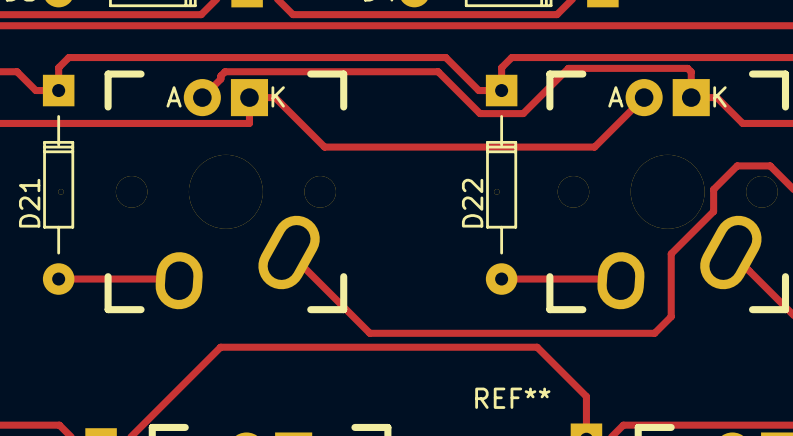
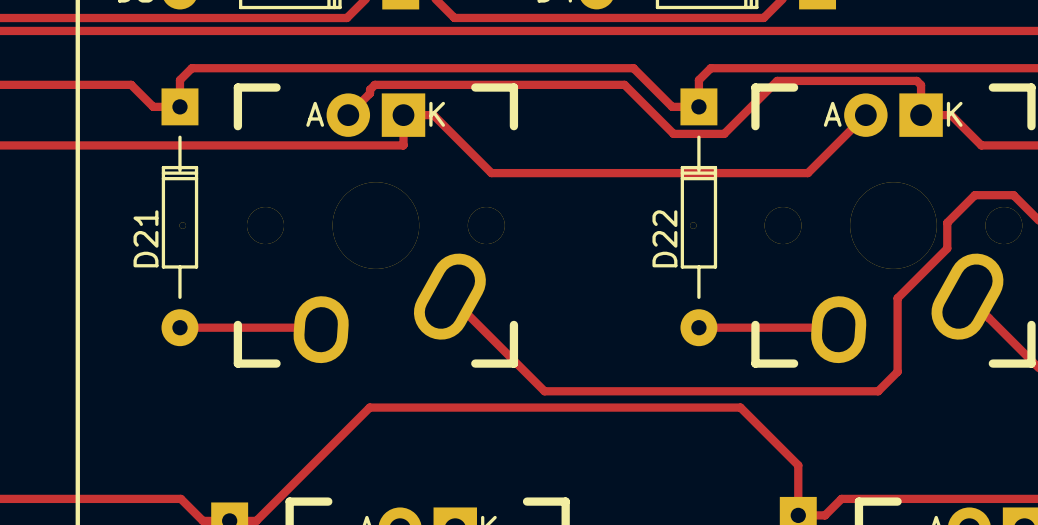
REF** name: REF** (512, 398) -> none

